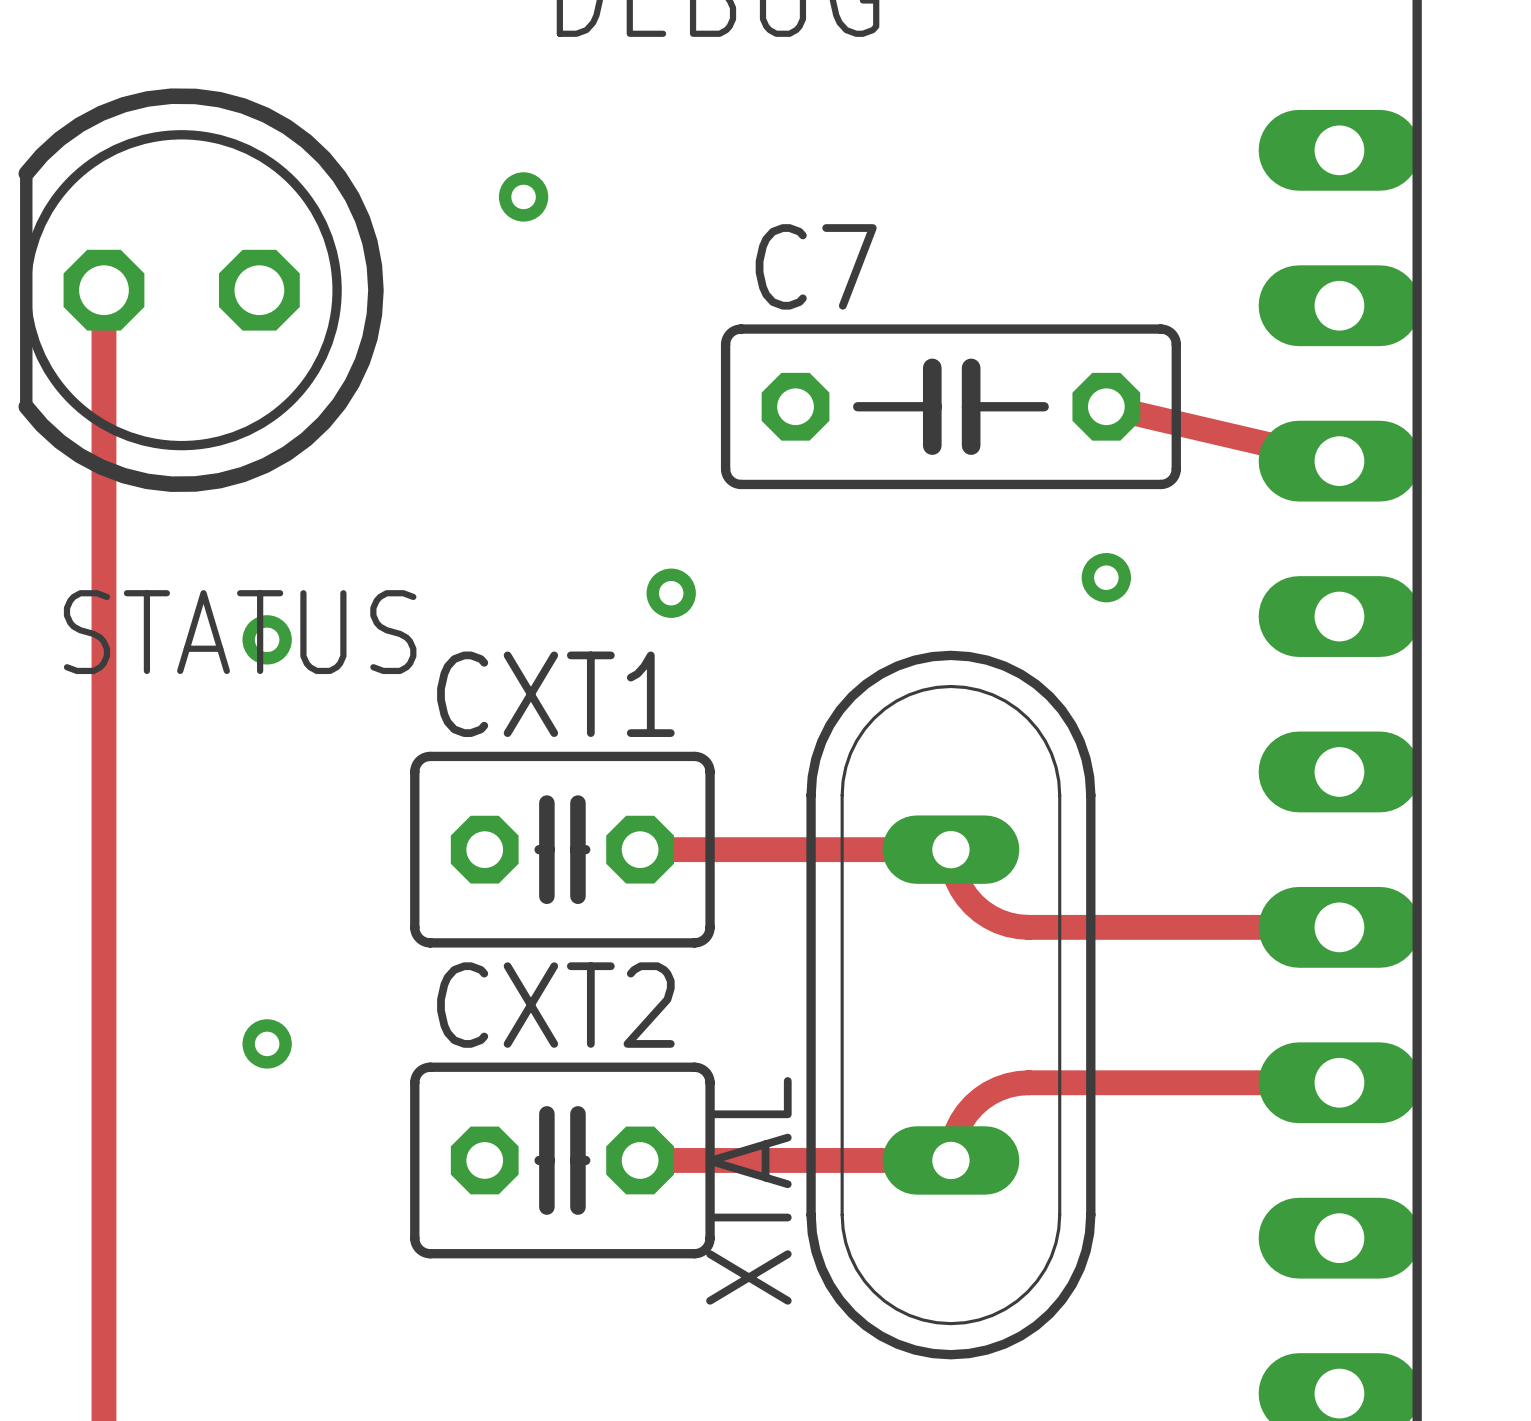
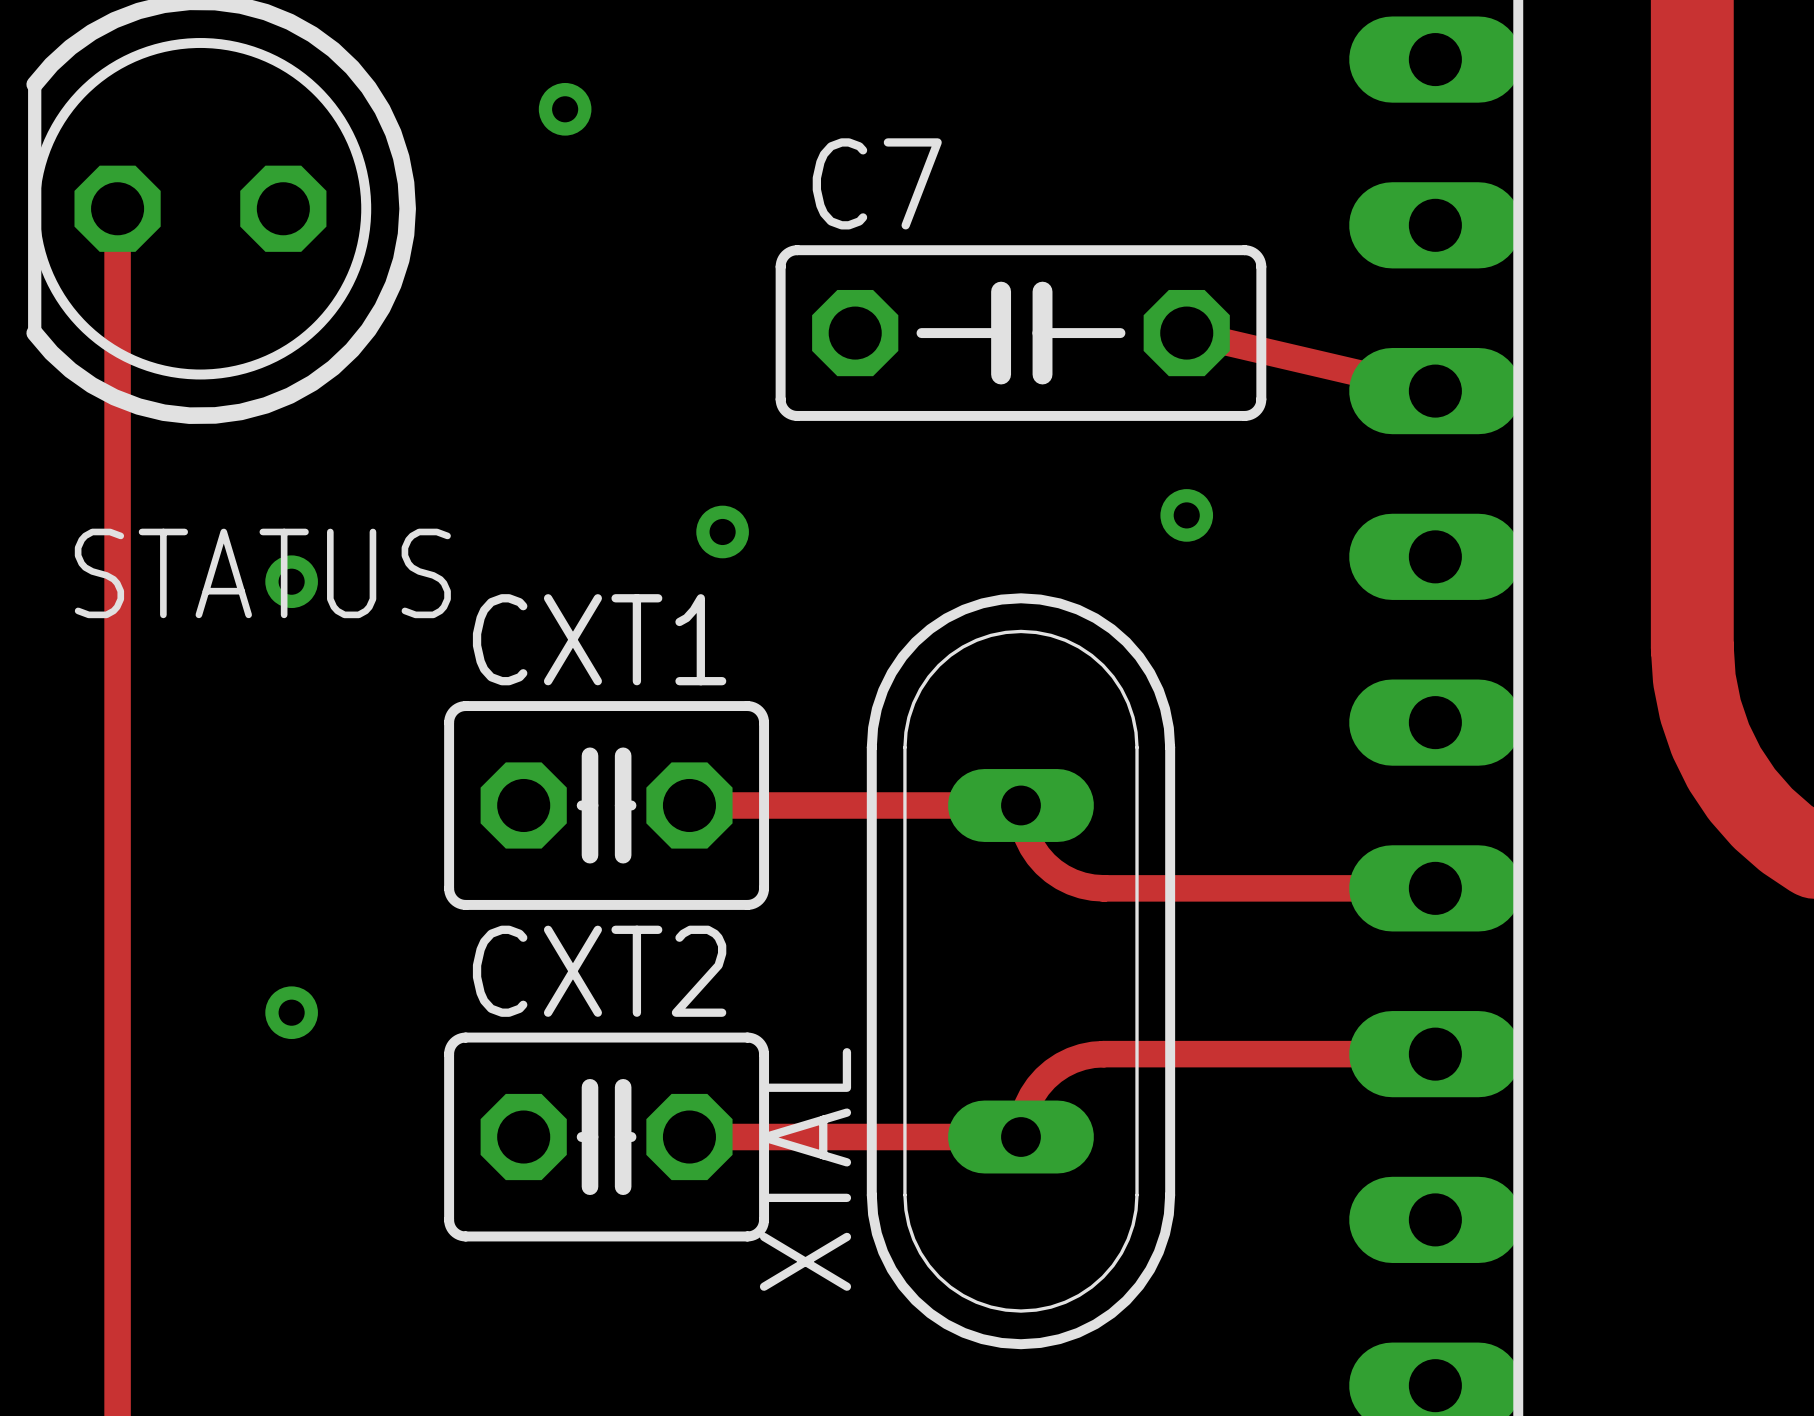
C7 footprint: [720, 324, 1181, 490] -> [775, 245, 1267, 421]
CXT1 footprint: [410, 751, 715, 948] -> [444, 701, 770, 910]
CXT2 footprint: [410, 1062, 715, 1259] -> [444, 1032, 770, 1242]

